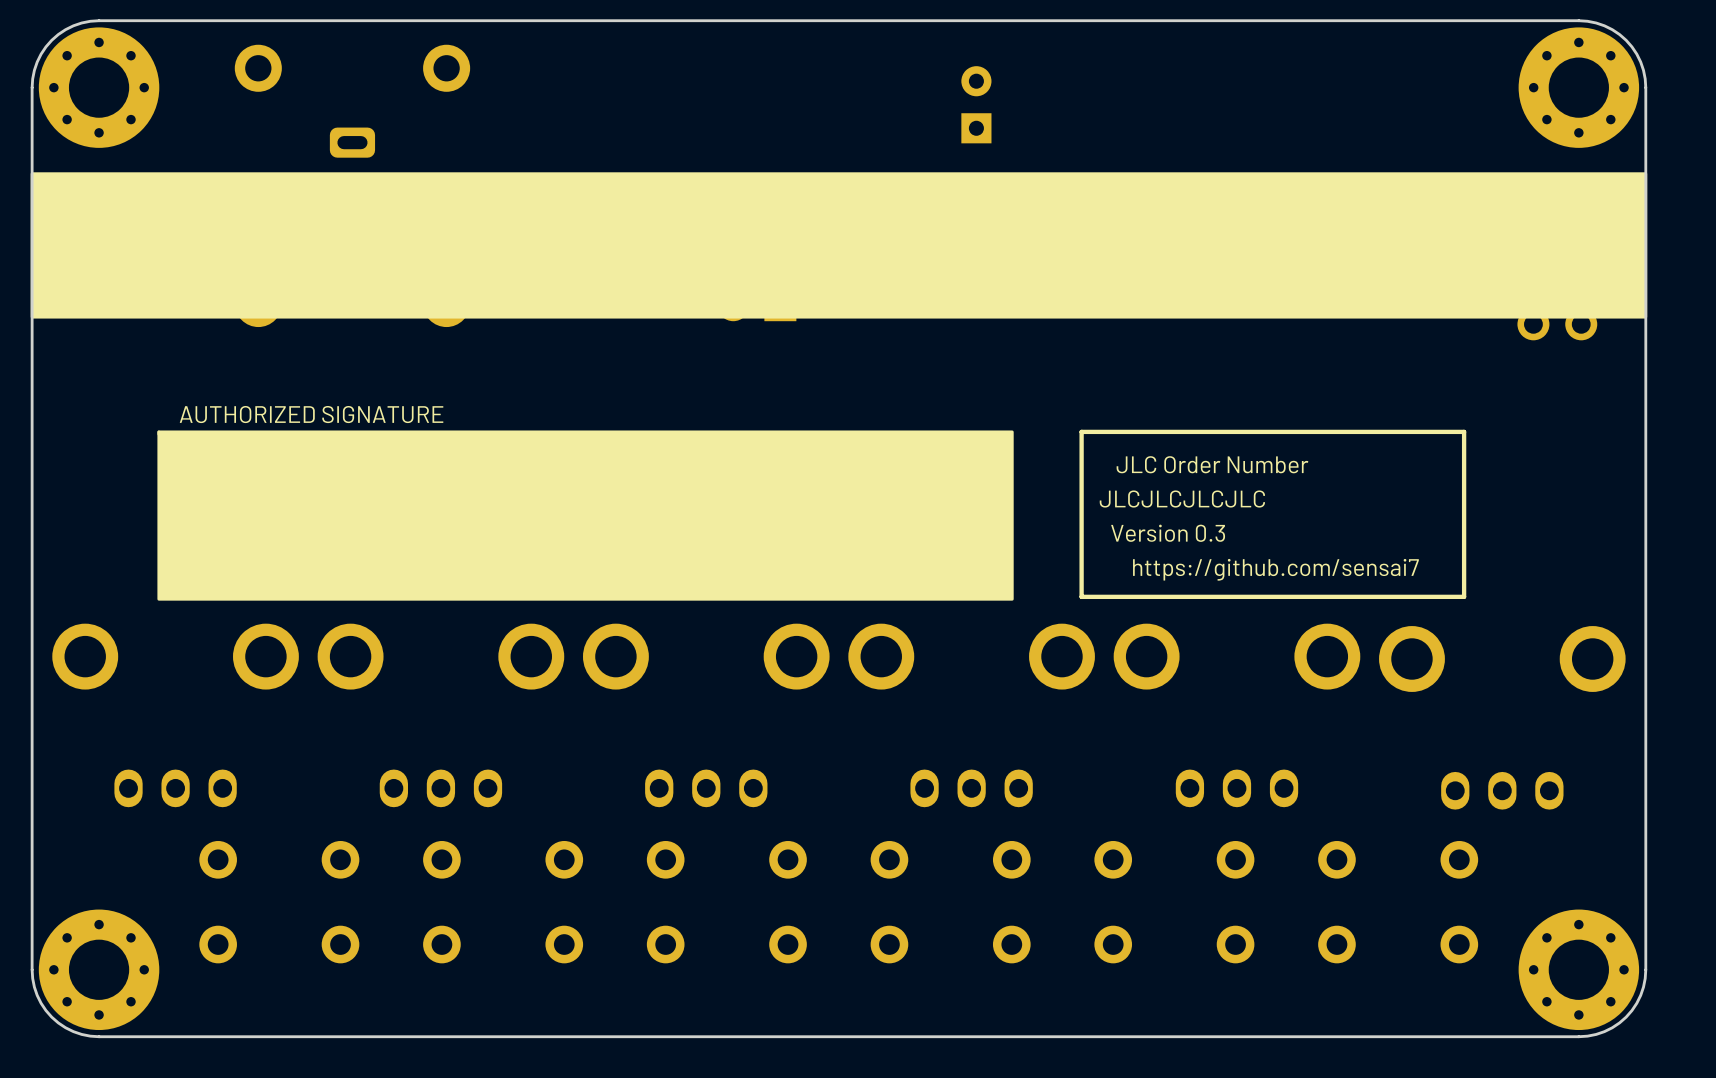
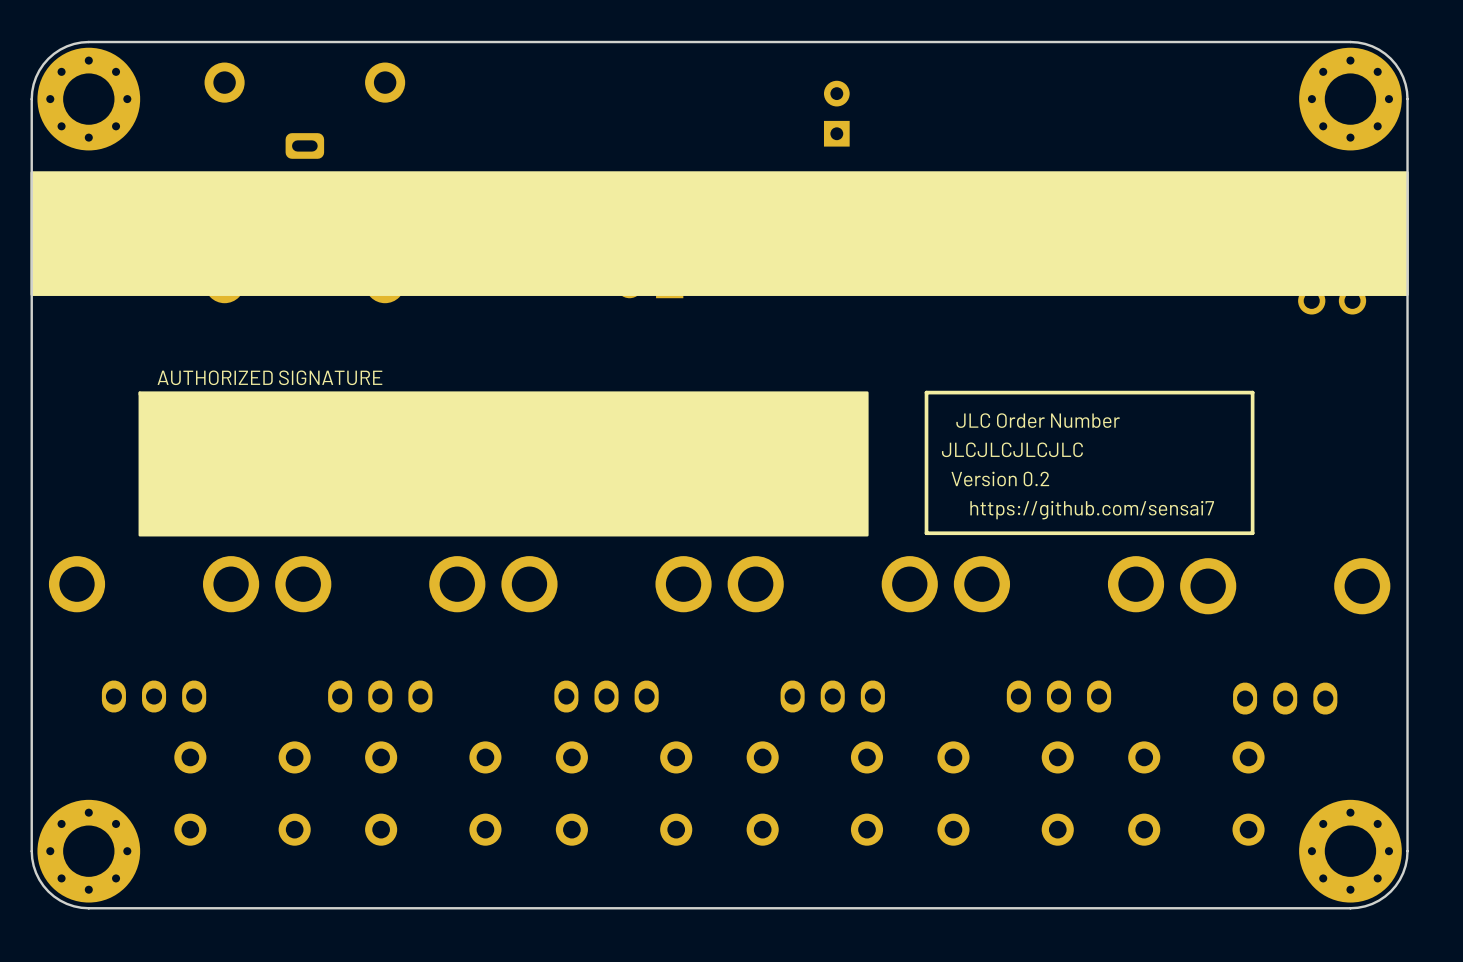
text: Version 0.3 (1168, 533) -> Version 0.2 (1000, 479)

